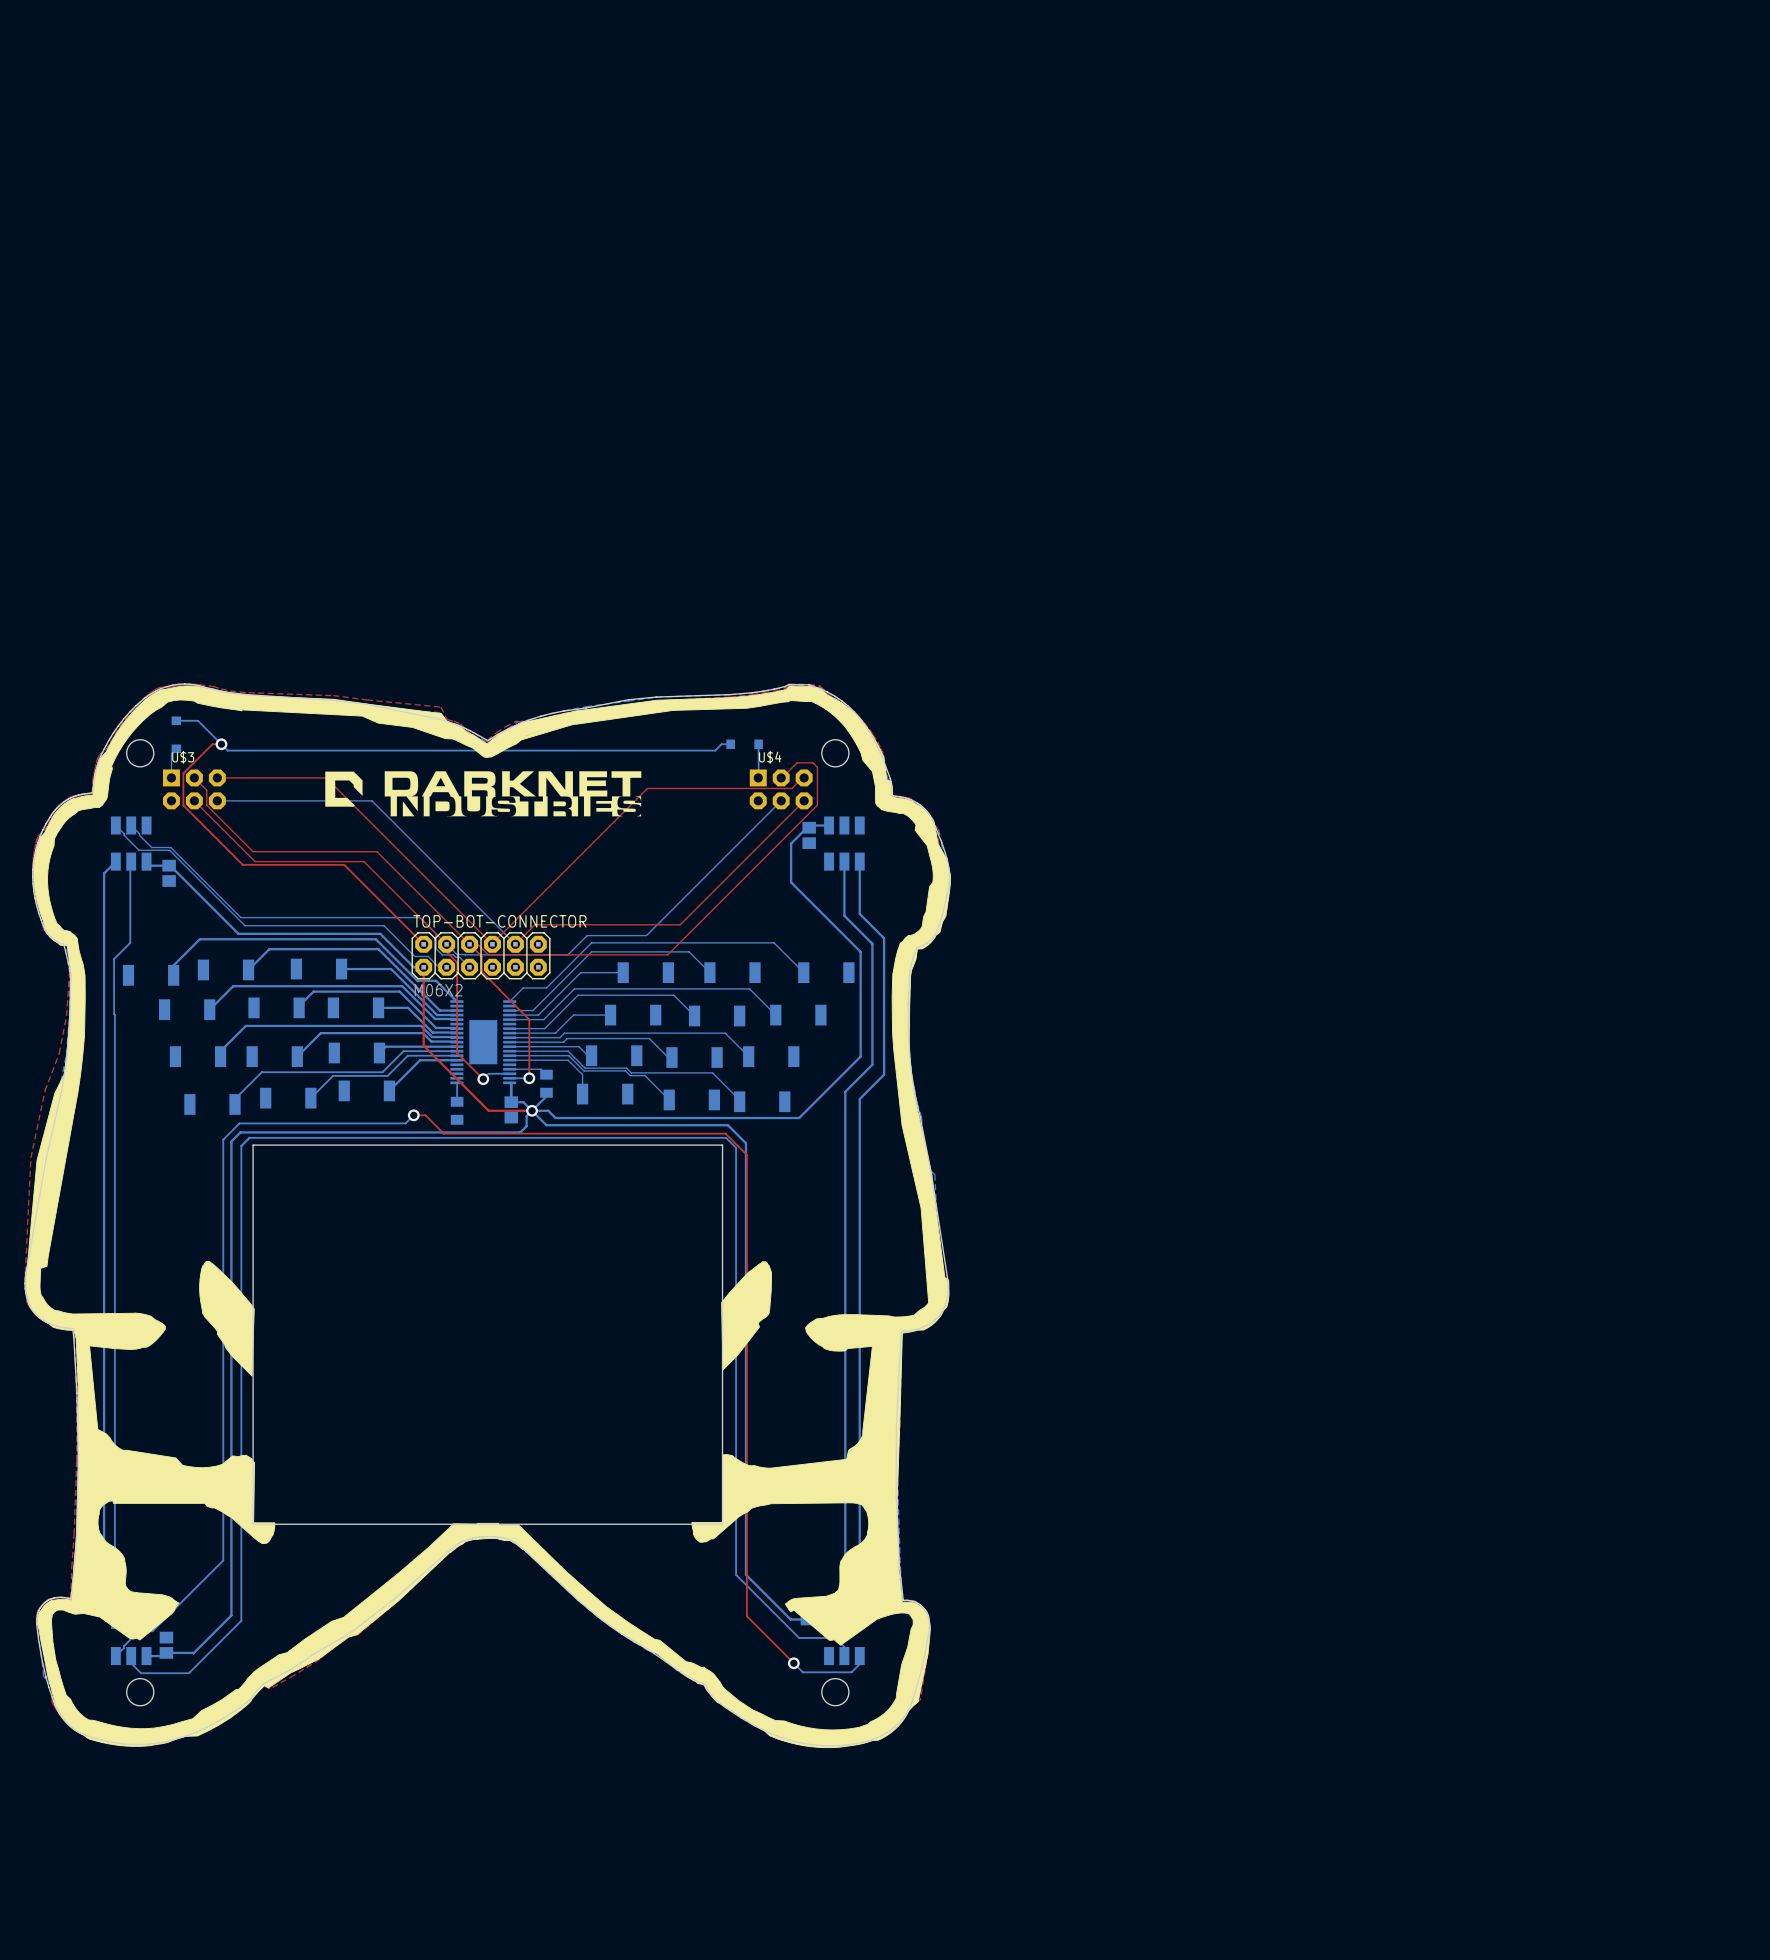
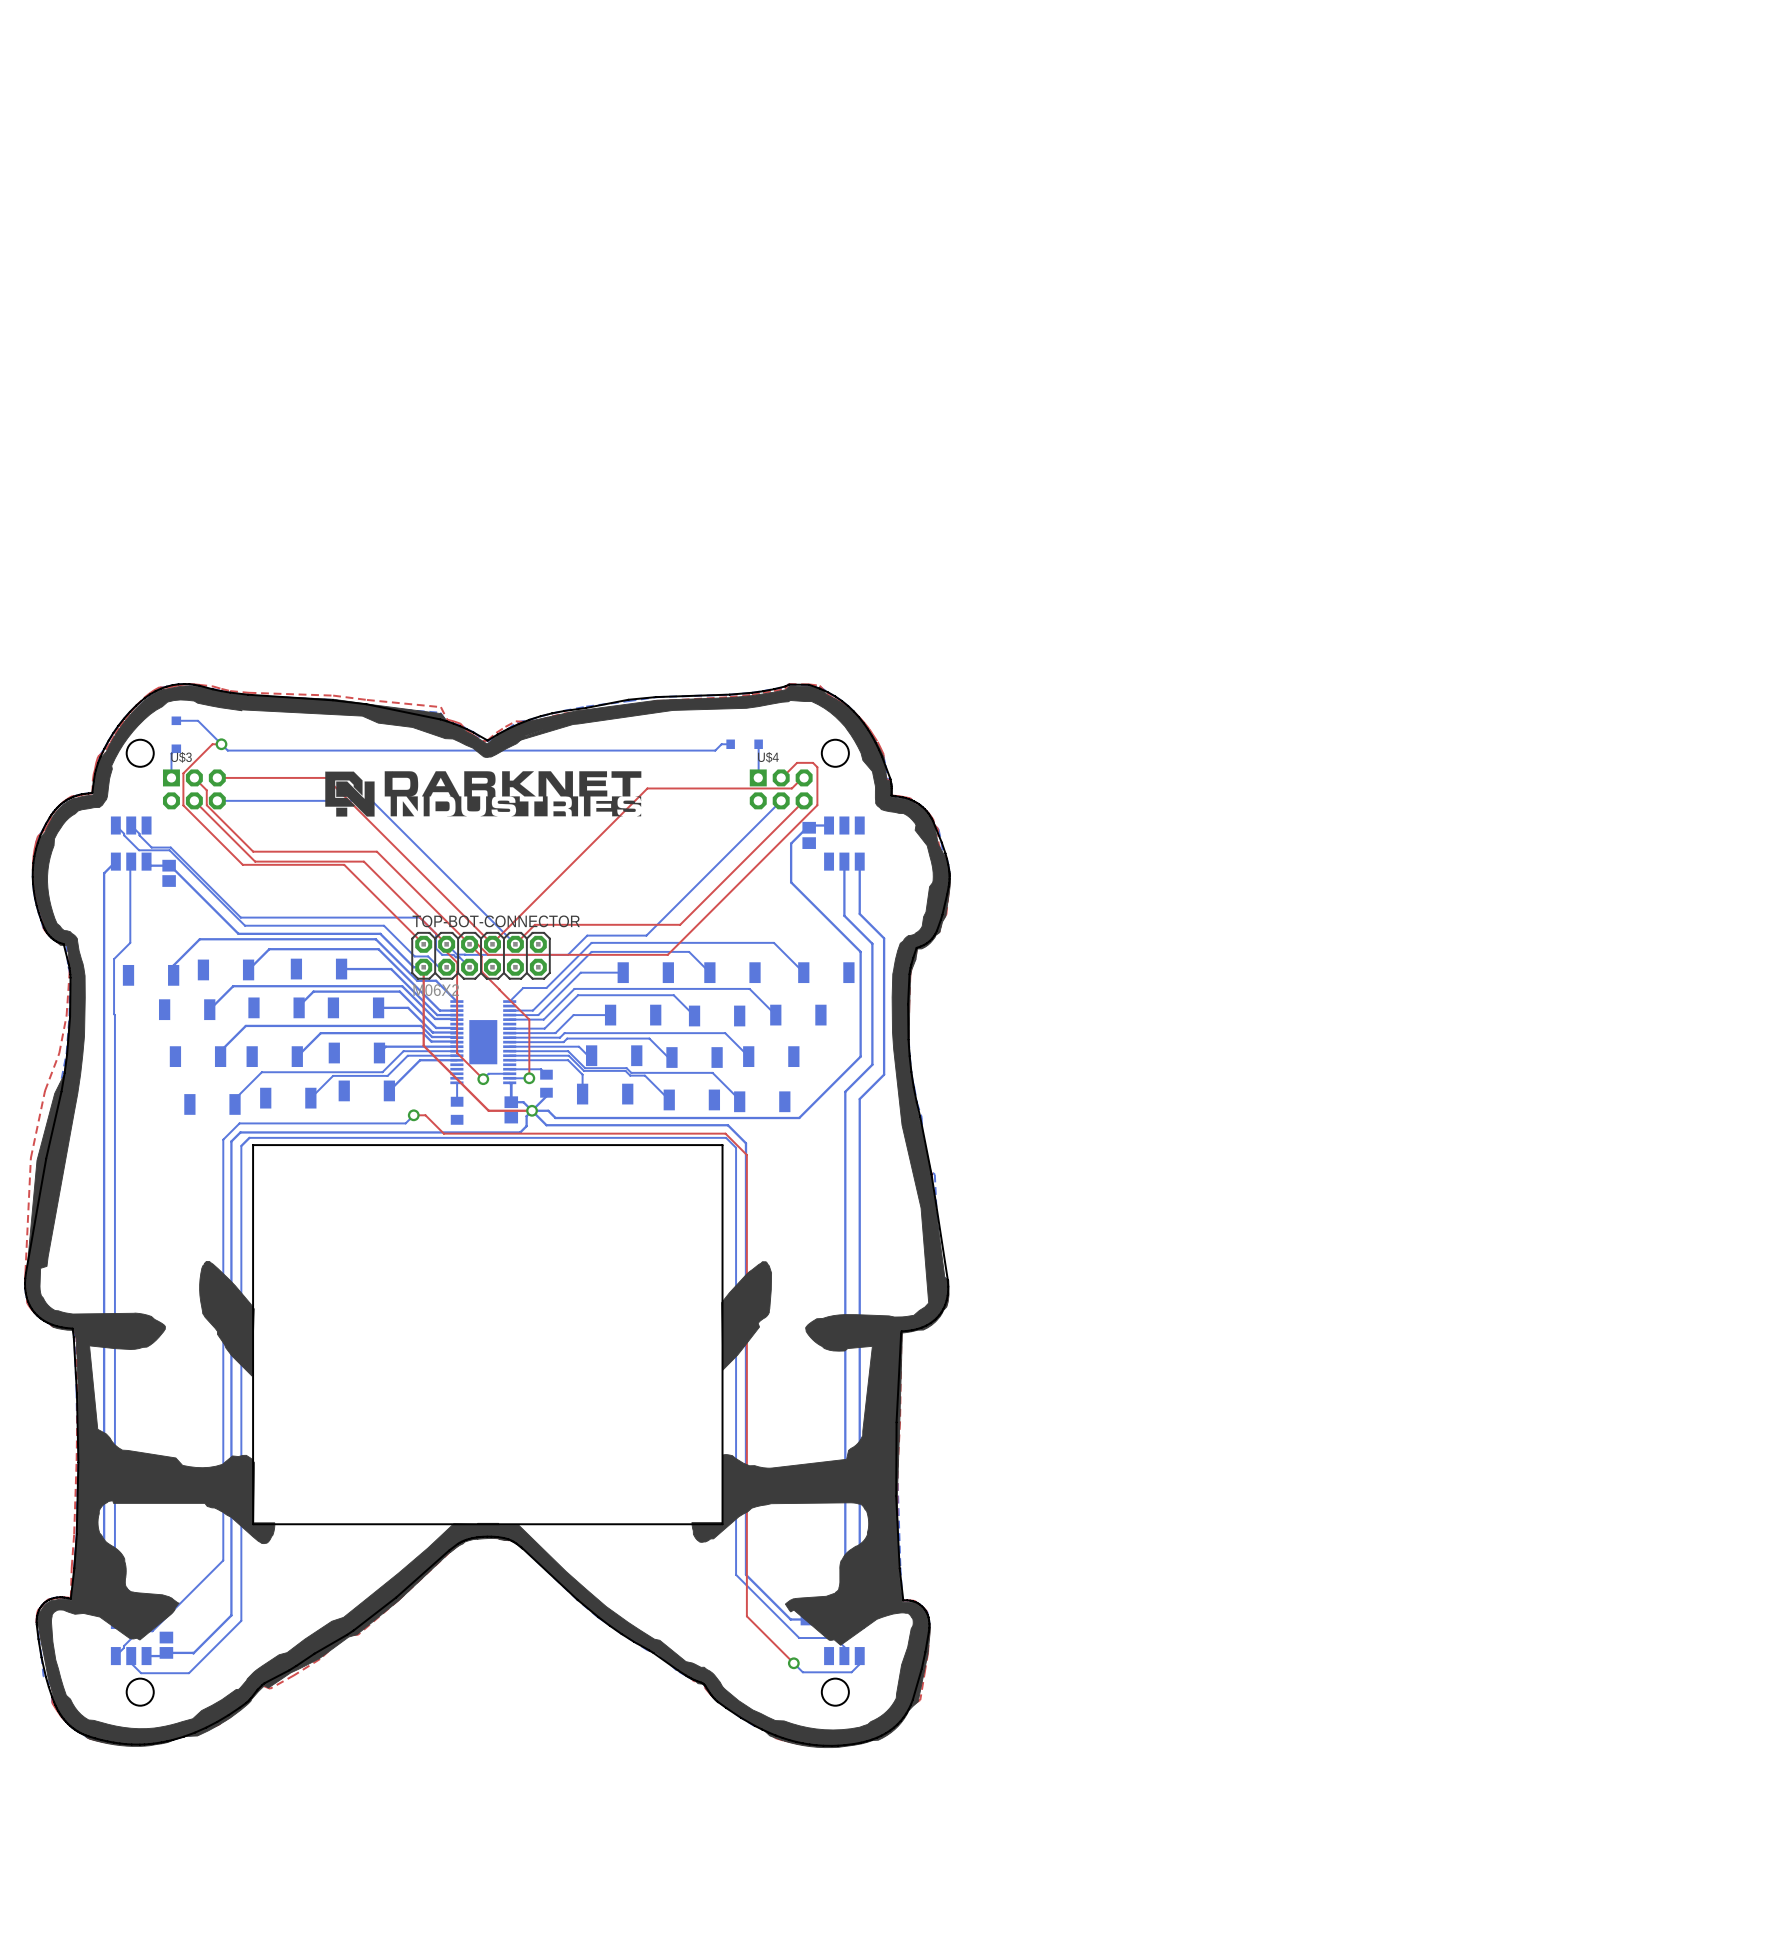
drawing shape: [325, 771, 642, 817] -> [325, 771, 642, 817]

